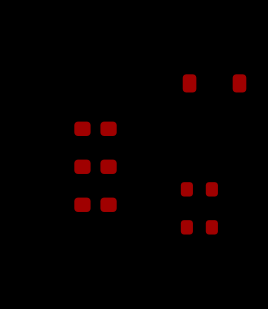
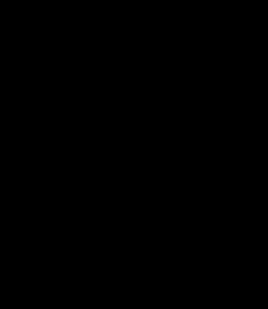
part: (214, 83) -> none
part: (95, 128) -> none
part: (95, 166) -> none
part: (199, 189) -> none
part: (95, 204) -> none
part: (199, 227) -> none

